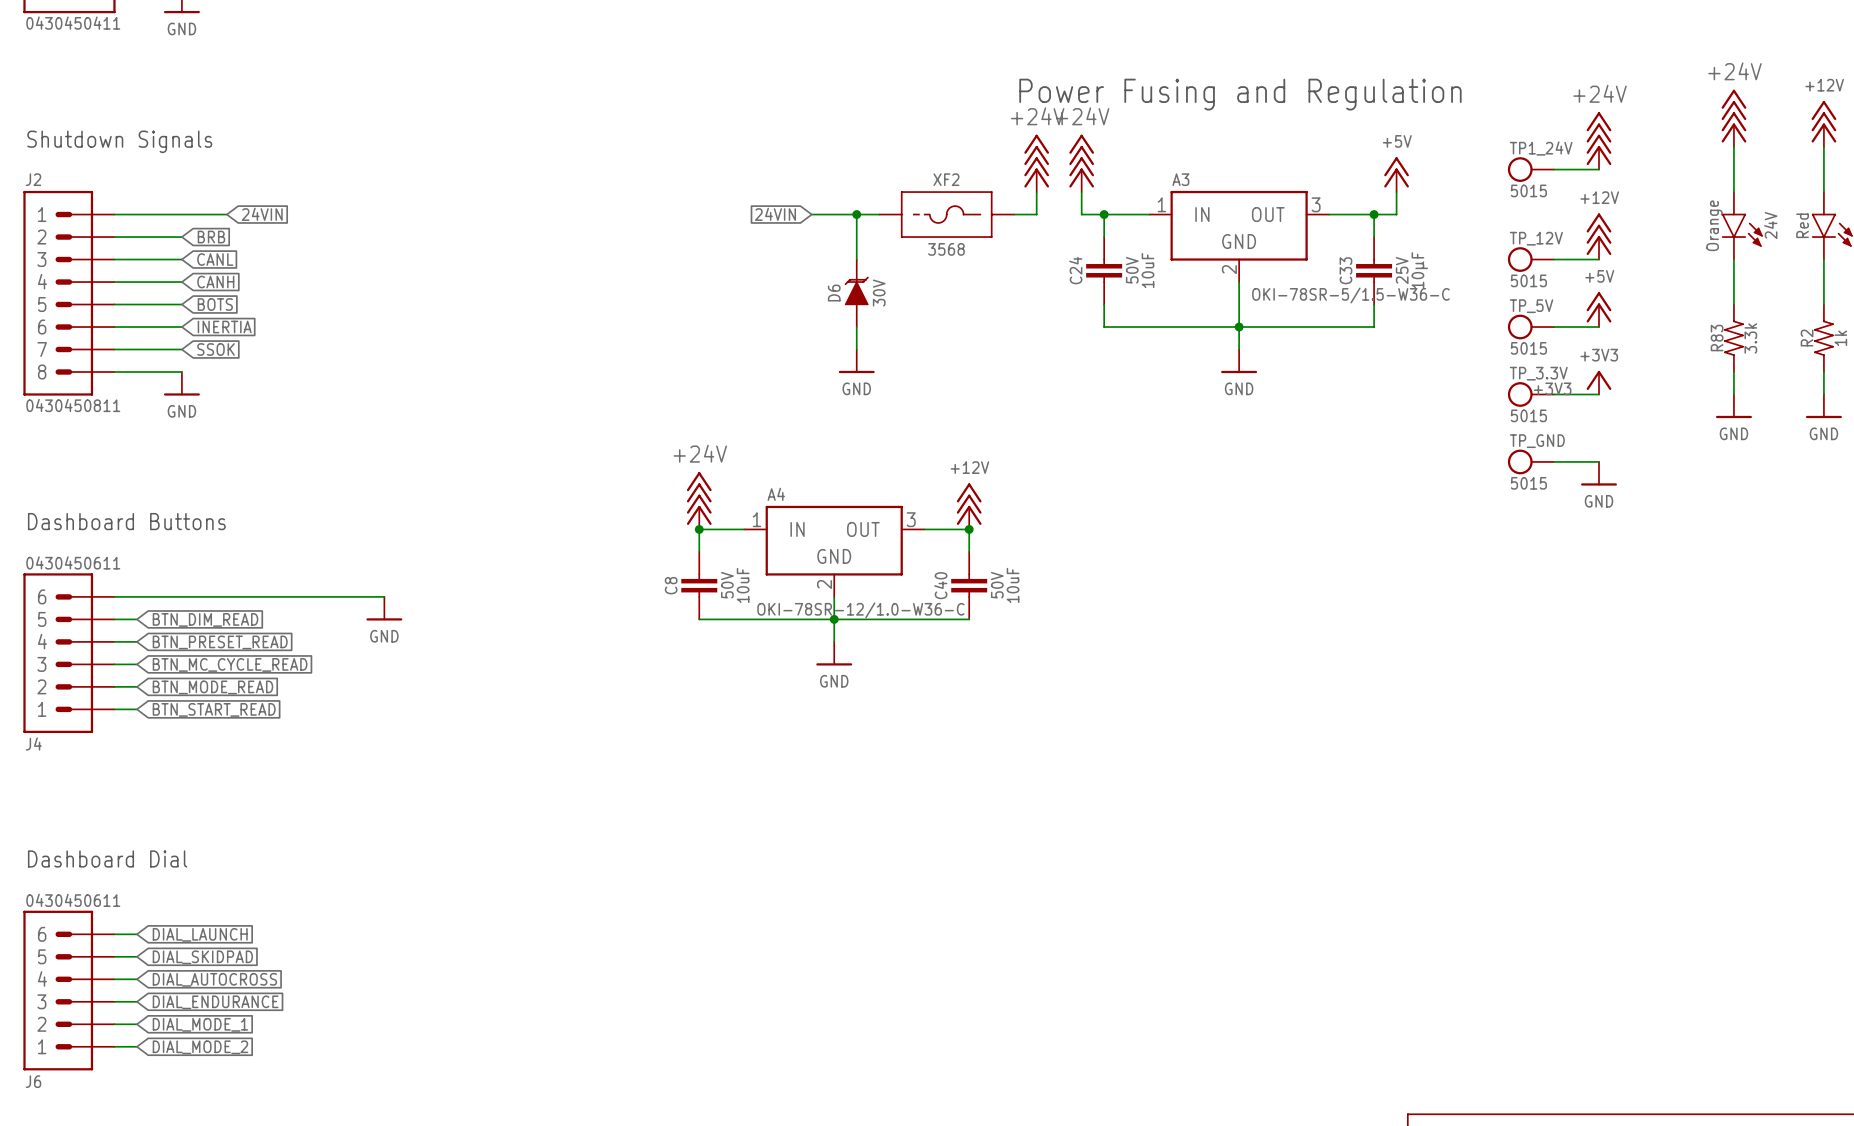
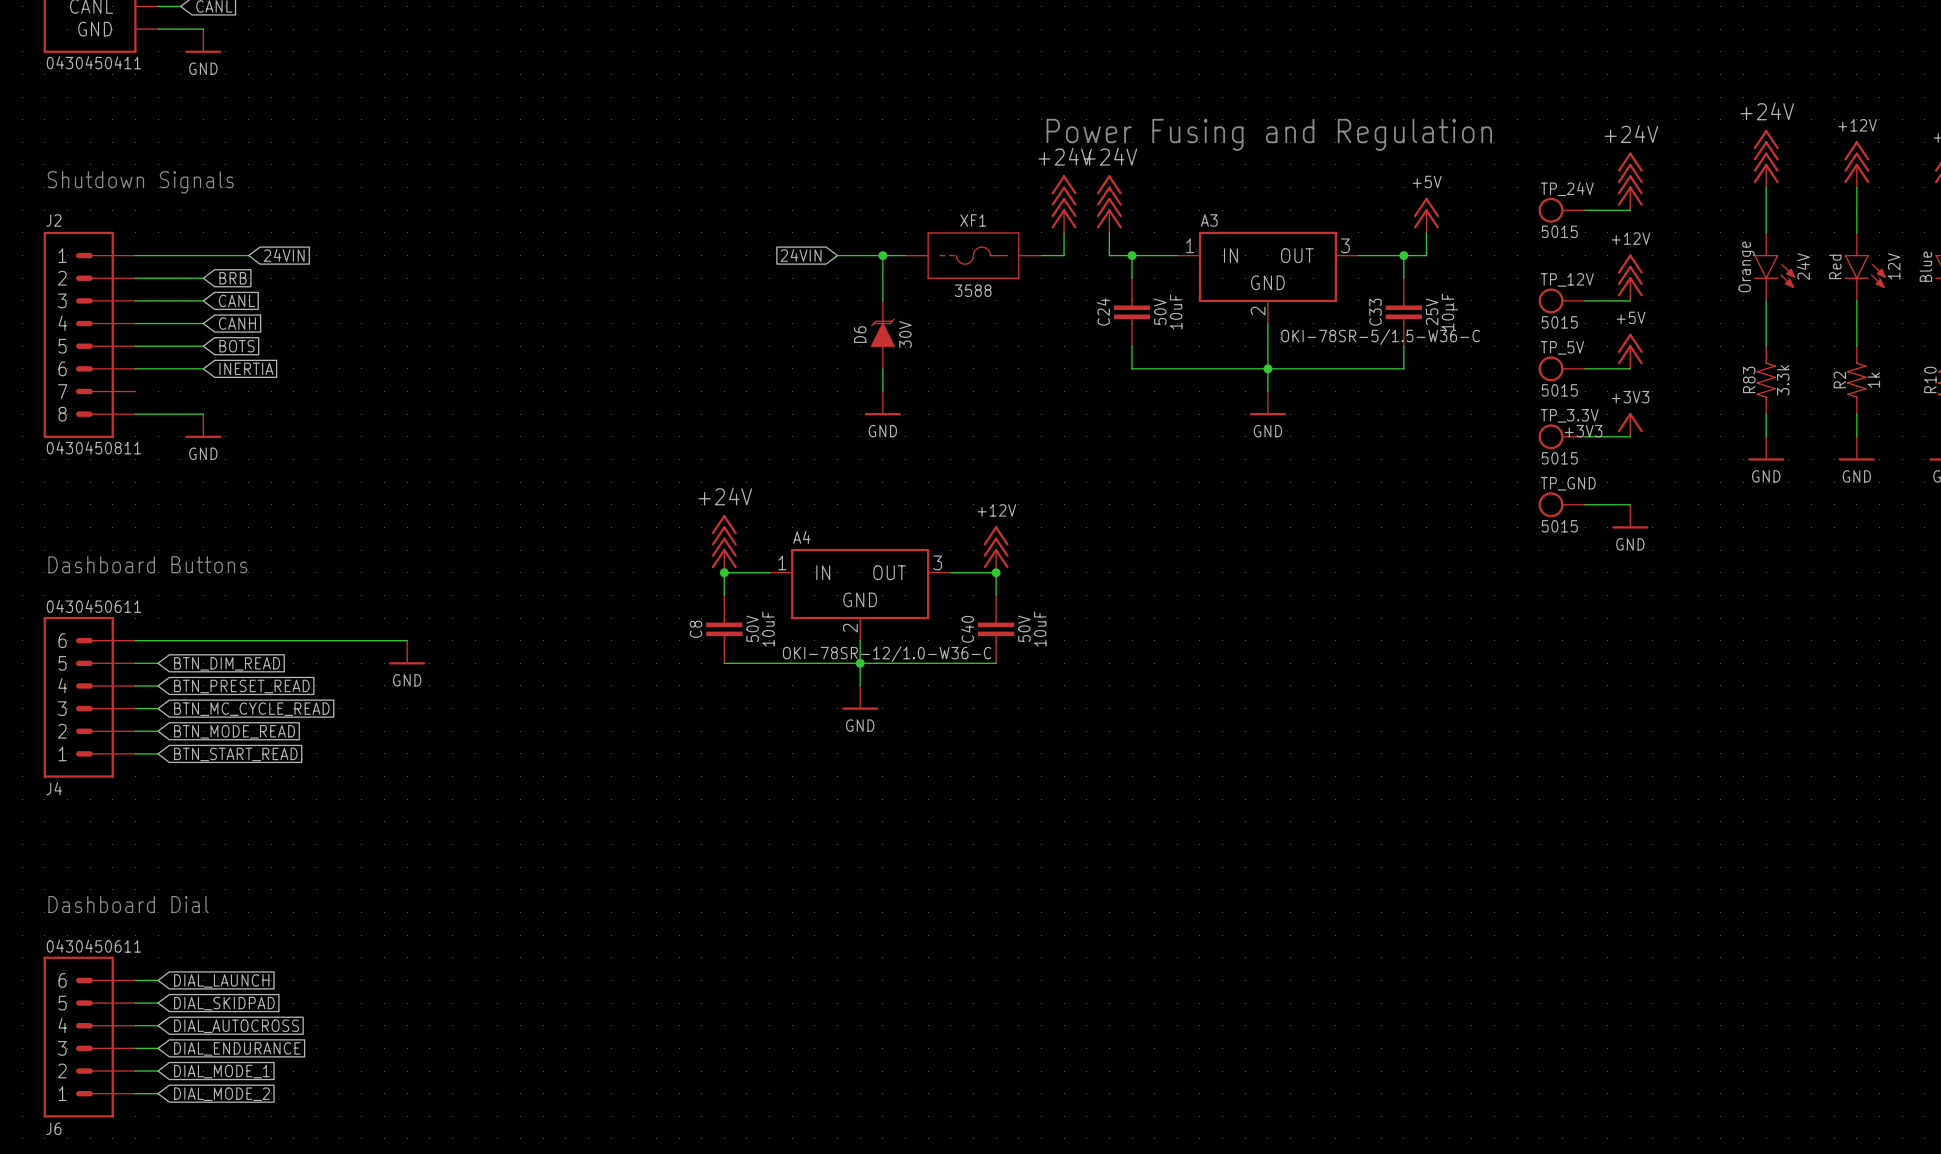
TP1_24V name: TP1_24V (1541, 148) -> TP_24V (1567, 189)
XF2 name: XF2 (946, 179) -> XF1 (973, 220)
XF2 text: 3568 (946, 249) -> 3588 (973, 290)
wire: (114, 349) (181, 349) -> none
global label: SSOK (216, 349) -> none

